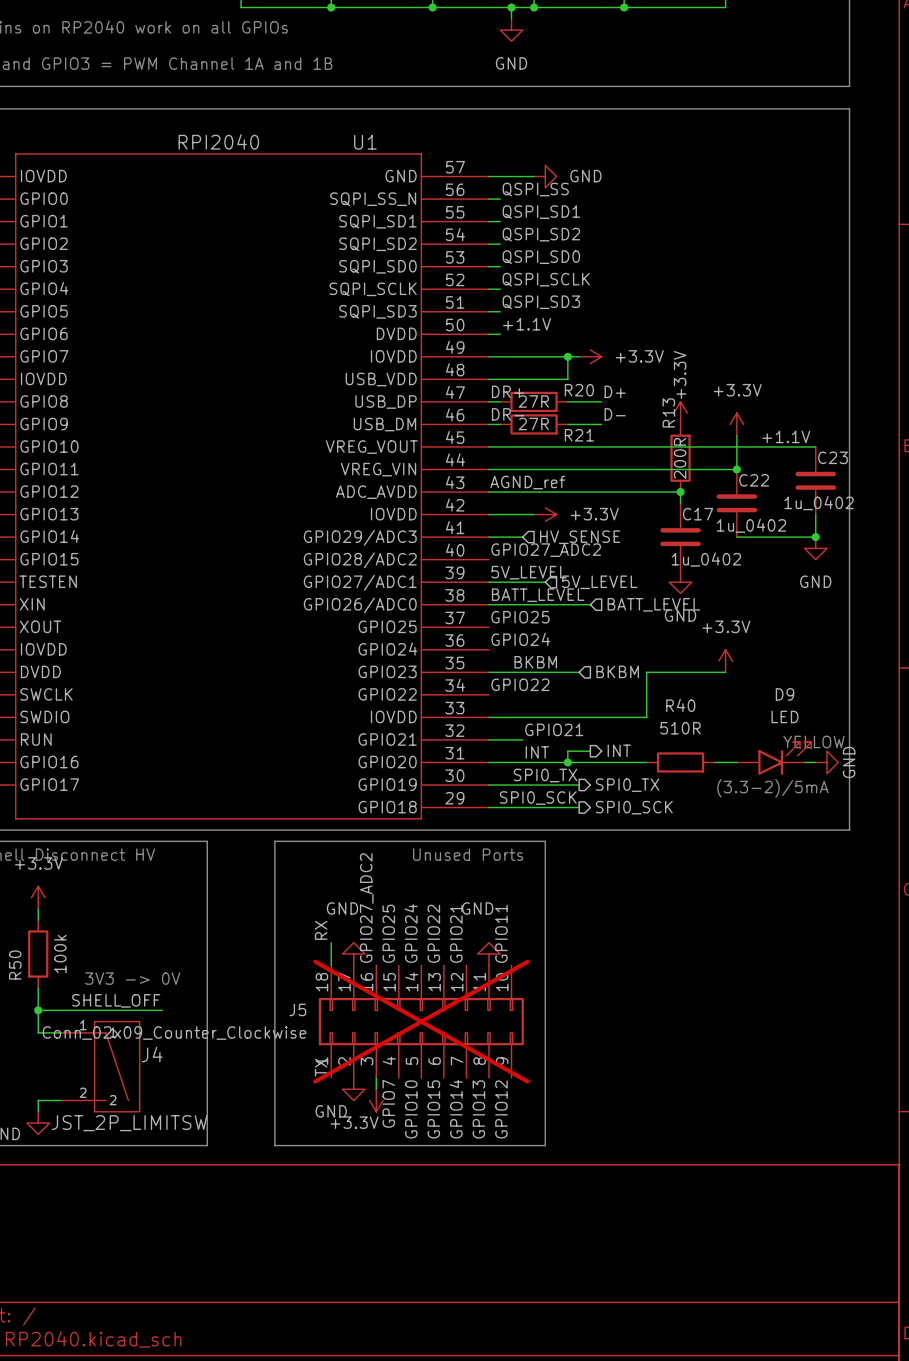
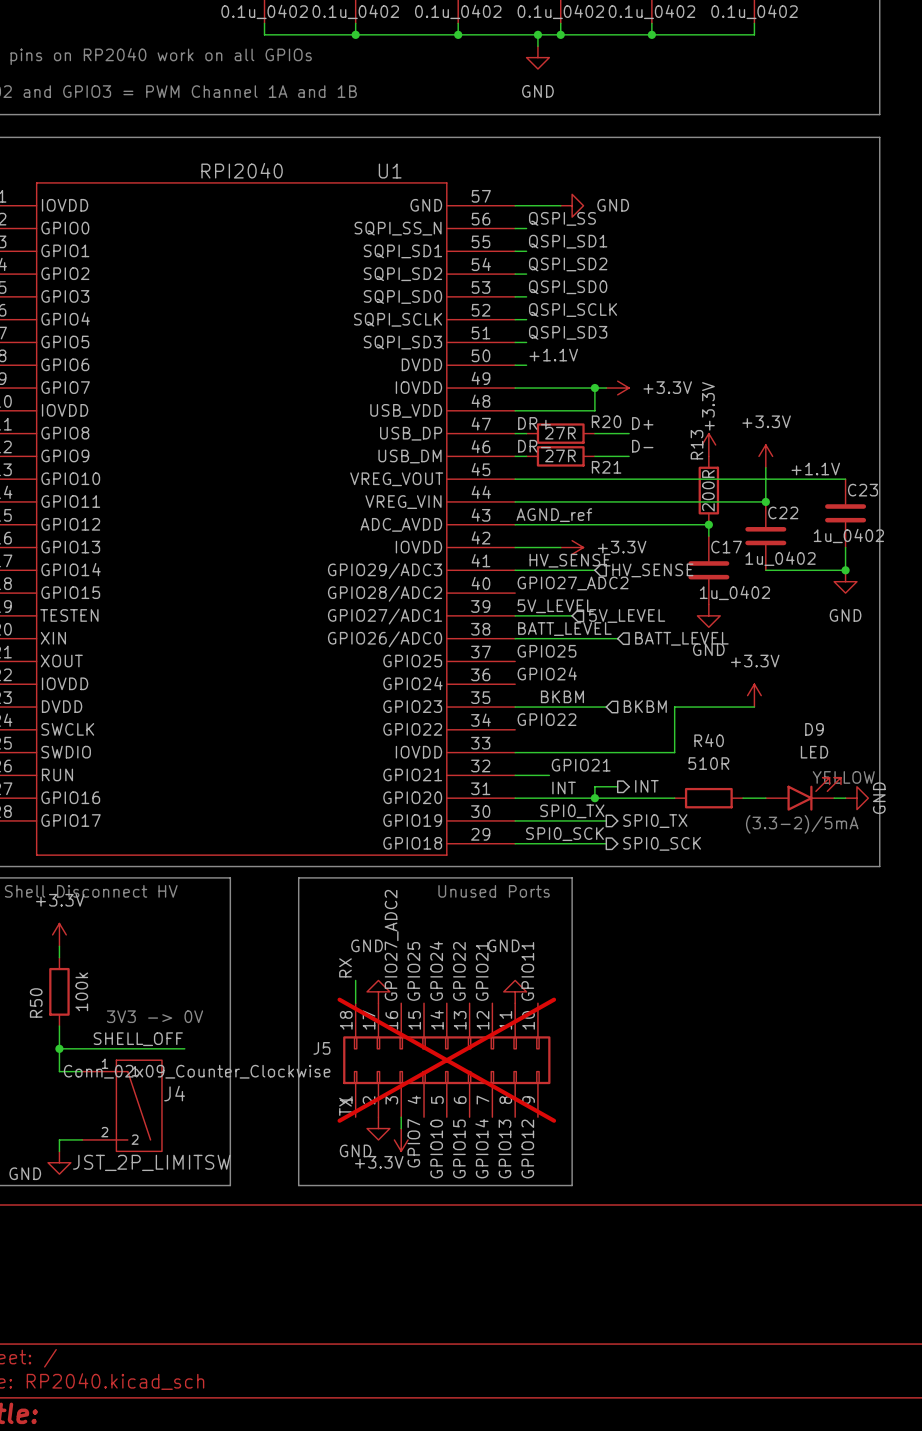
label: none -> HV_SENSE (570, 560)
wire: none -> (549, 570) (594, 570)
hierarchical label position: HV_SENSE (580, 537) -> HV_SENSE (652, 570)

